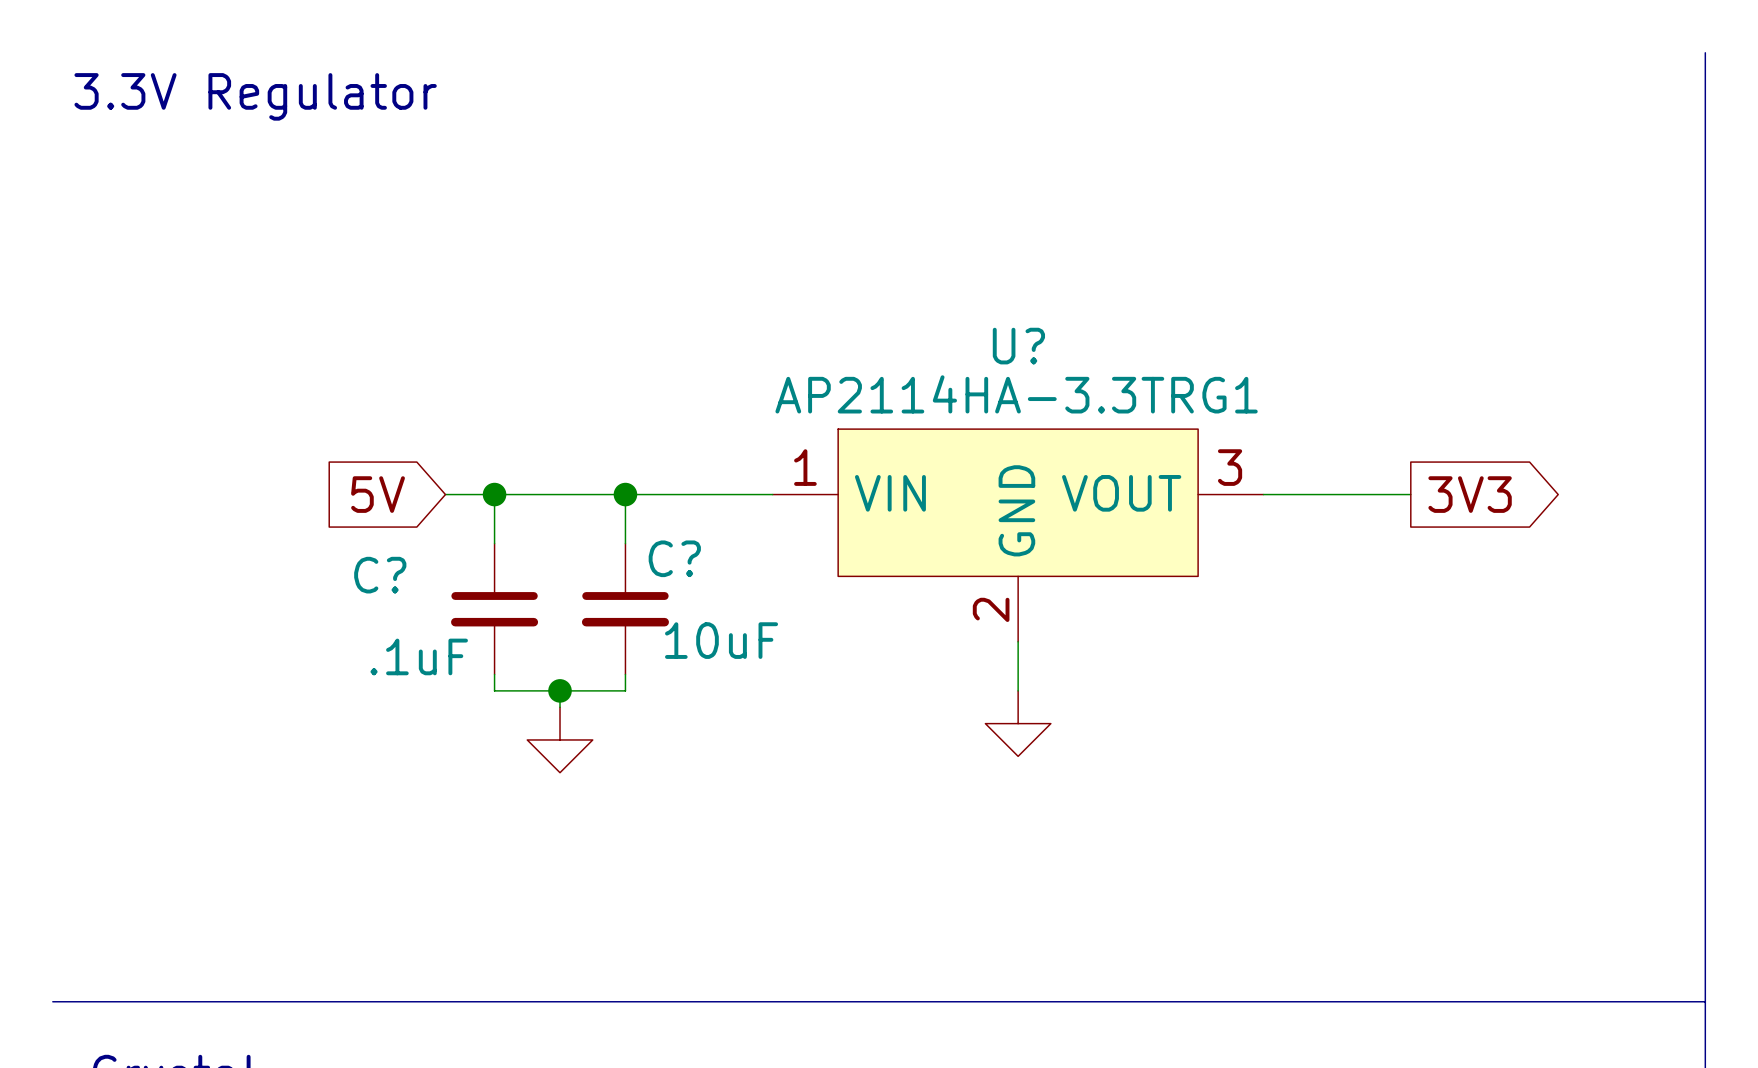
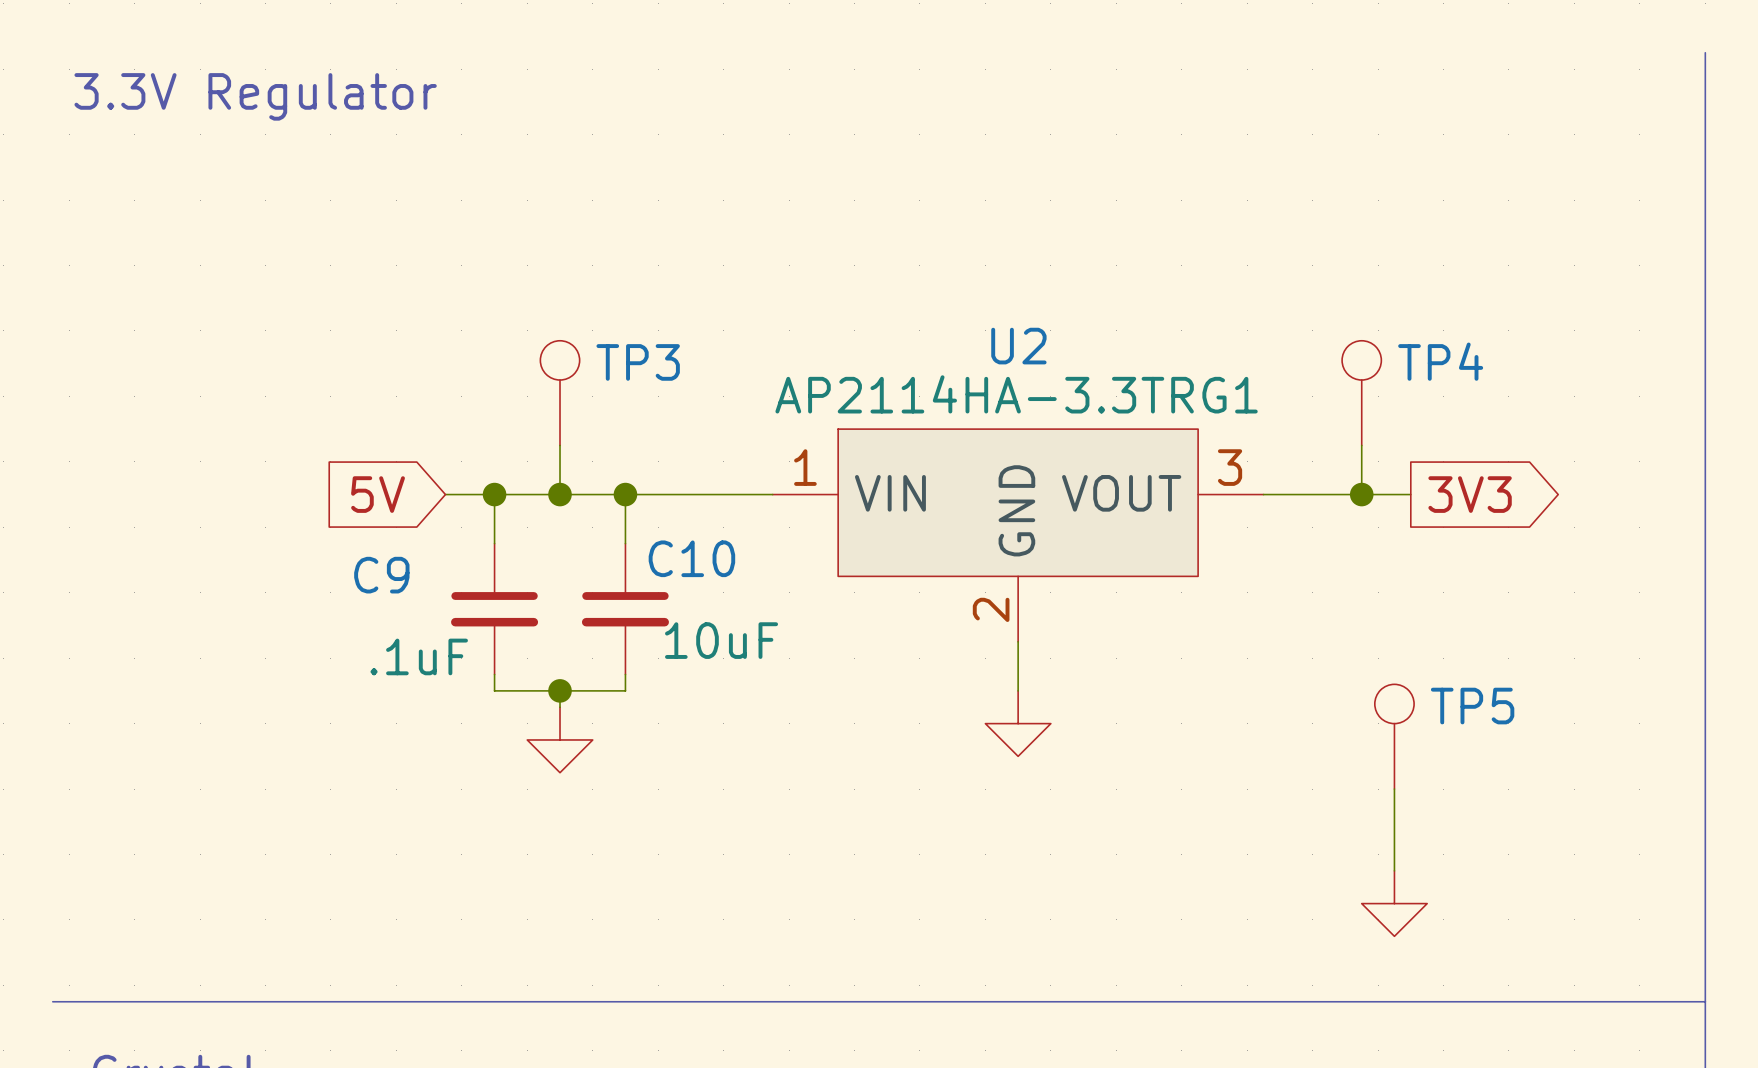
U? name: U? (1018, 346) -> U2 (1018, 346)
TP3: none -> (560, 393)
TP4: none -> (1361, 393)
wire: none -> (560, 445) (560, 494)
wire: none -> (1361, 445) (1361, 494)
junction: none -> (560, 494)
junction: none -> (1361, 494)
C? name: C? (674, 558) -> C10 (691, 558)
C? name: C? (380, 575) -> C9 (381, 575)
TP5: none -> (1394, 736)
wire: none -> (1394, 789) (1394, 870)
power symbol: none -> (1394, 903)

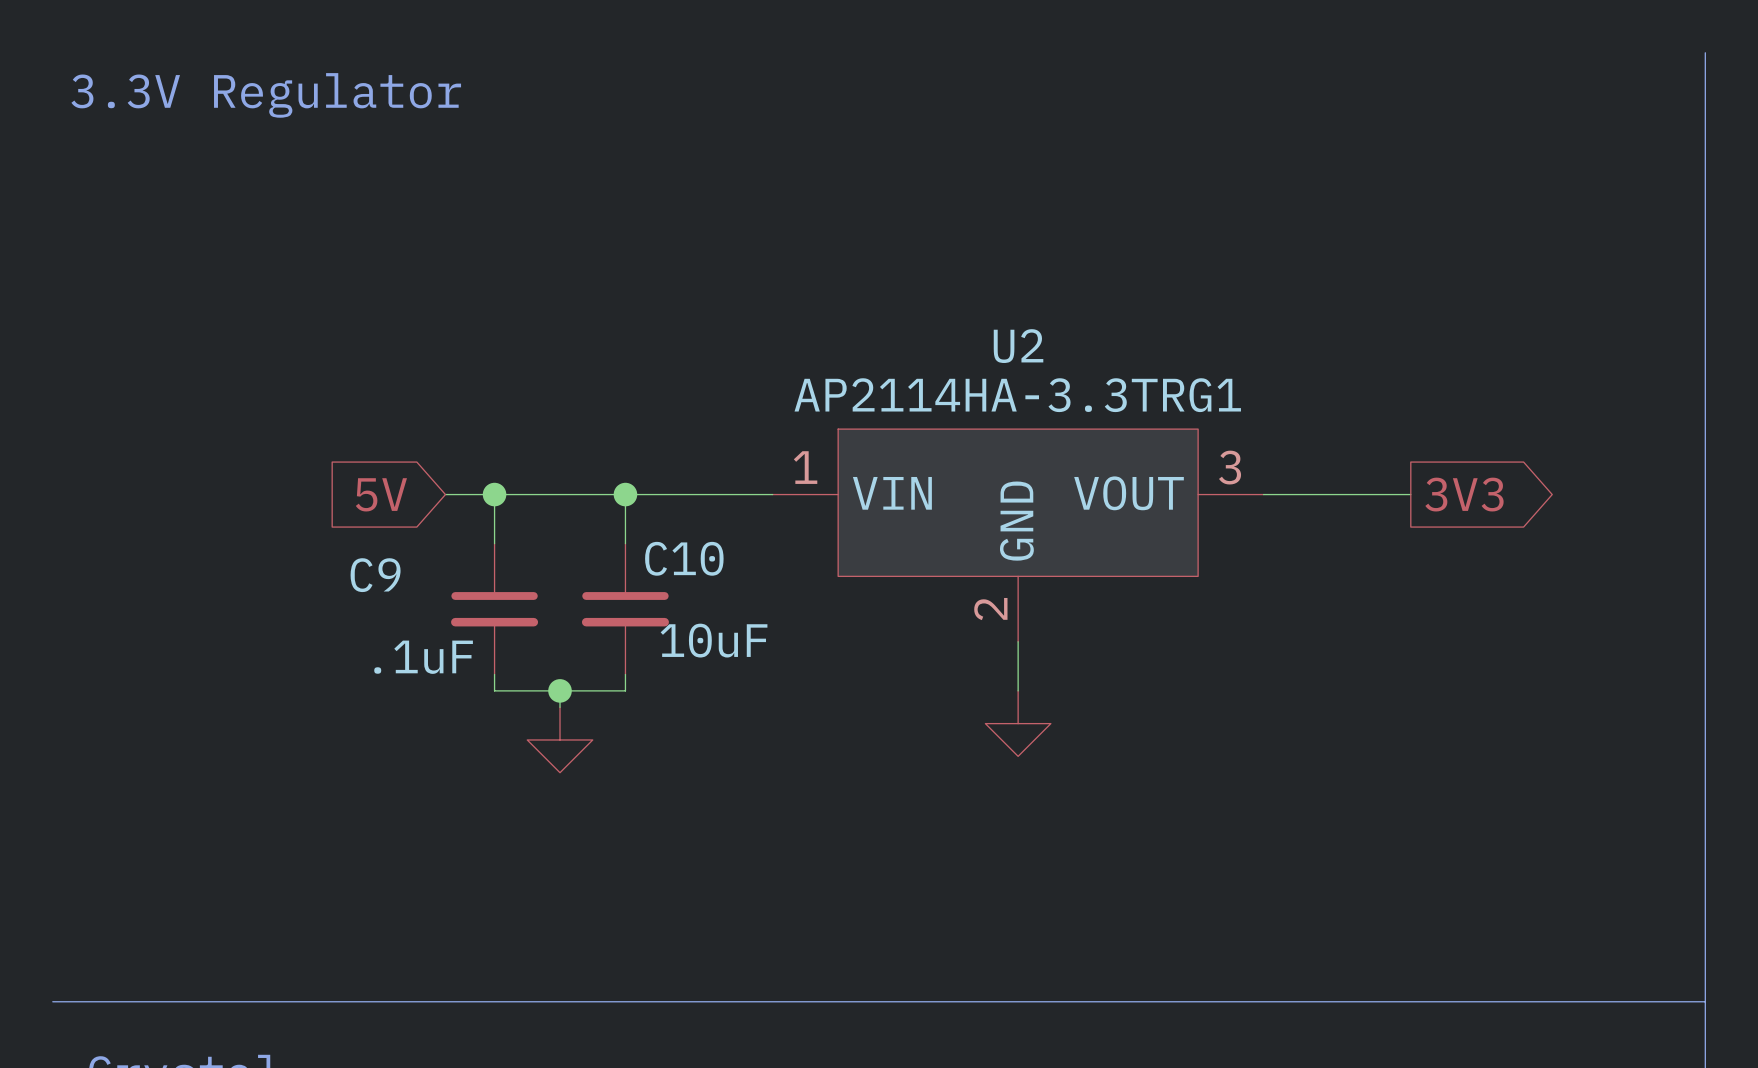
TP3: (560, 393) -> none
TP4: (1361, 393) -> none
wire: (560, 445) (560, 494) -> none
wire: (1361, 445) (1361, 494) -> none
junction: (560, 494) -> none
junction: (1361, 494) -> none
TP5: (1394, 736) -> none
wire: (1394, 789) (1394, 870) -> none
power symbol: (1394, 903) -> none

